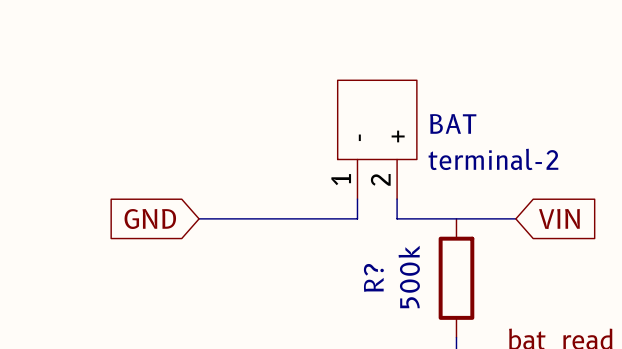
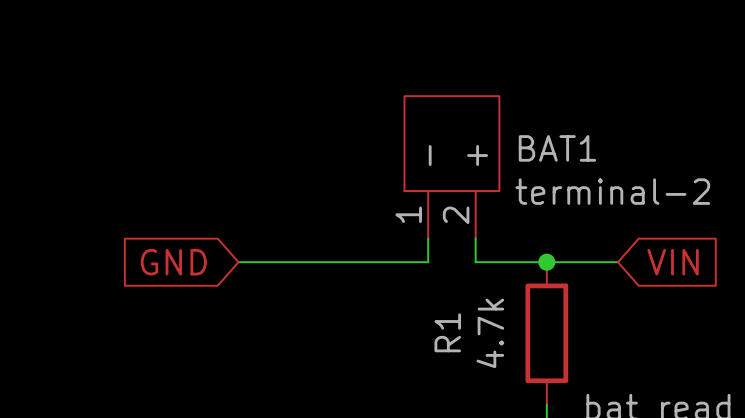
BAT name: BAT (453, 123) -> BAT1 (557, 148)
junction: none -> (546, 262)
R? value: 500k (409, 276) -> 4.7k (490, 333)
R? name: R? (373, 277) -> R1 (447, 332)

